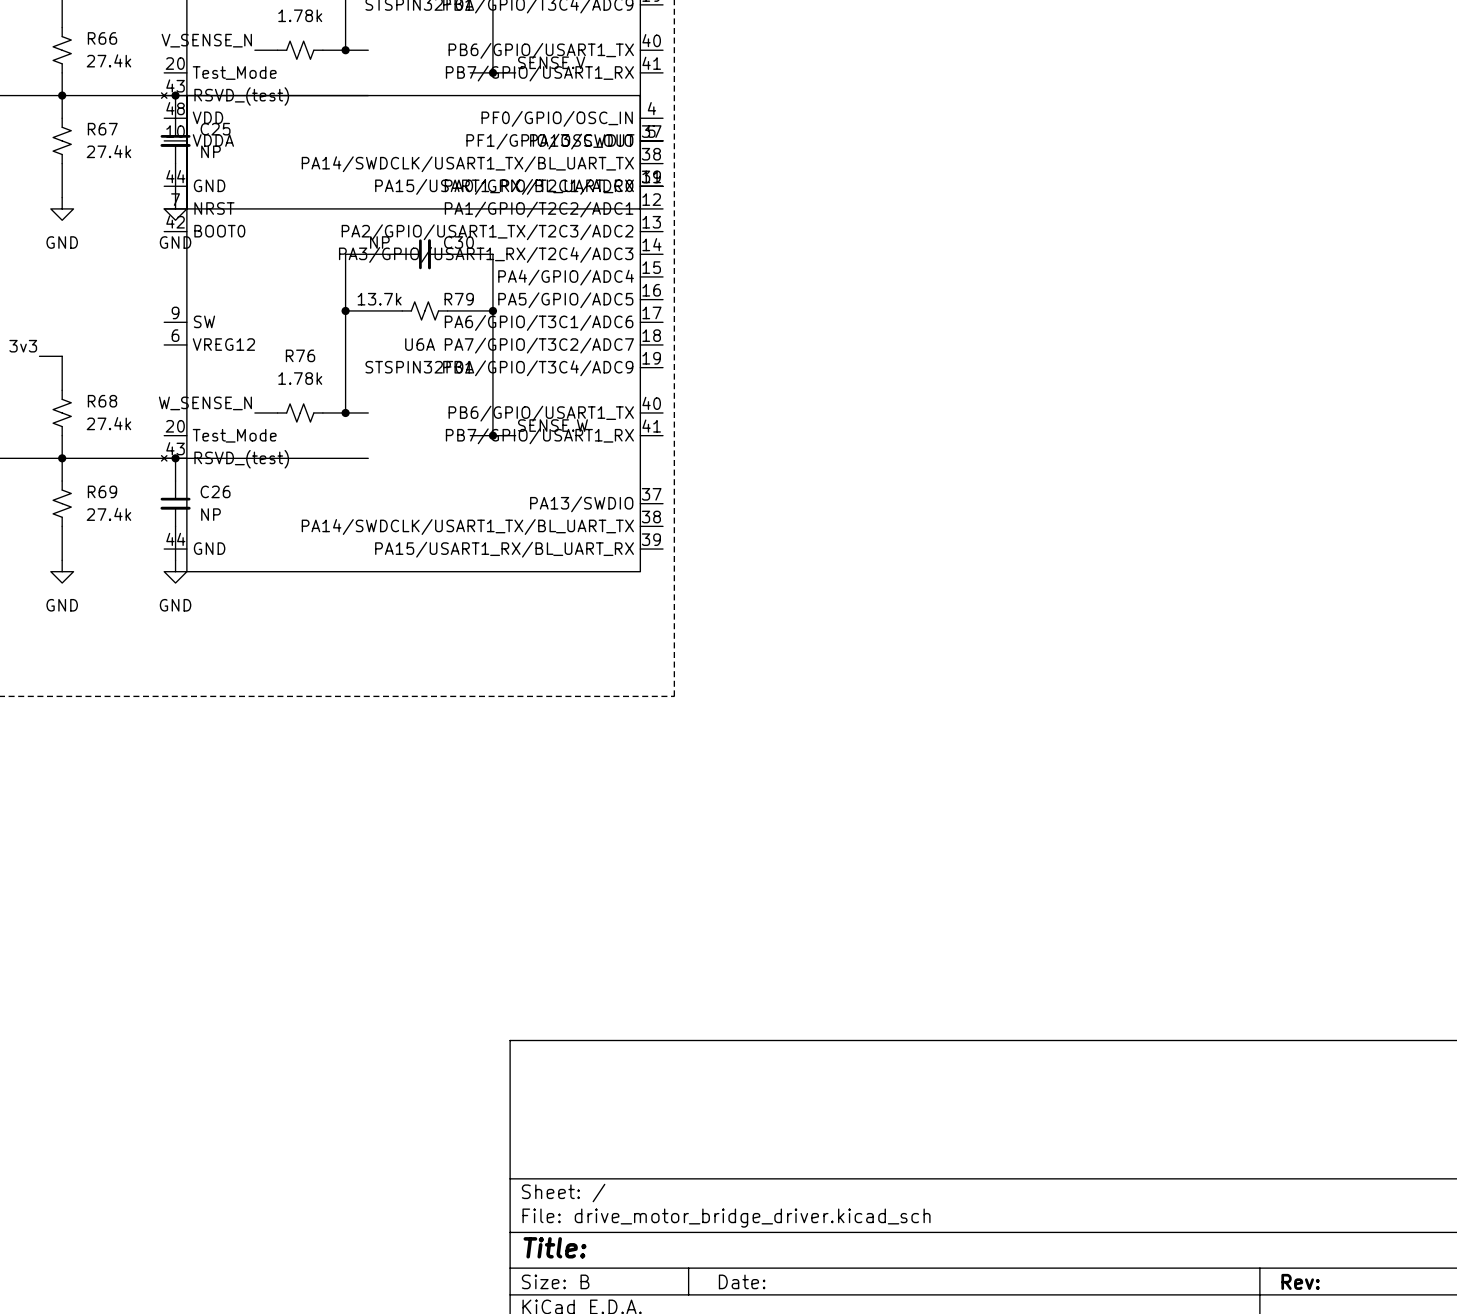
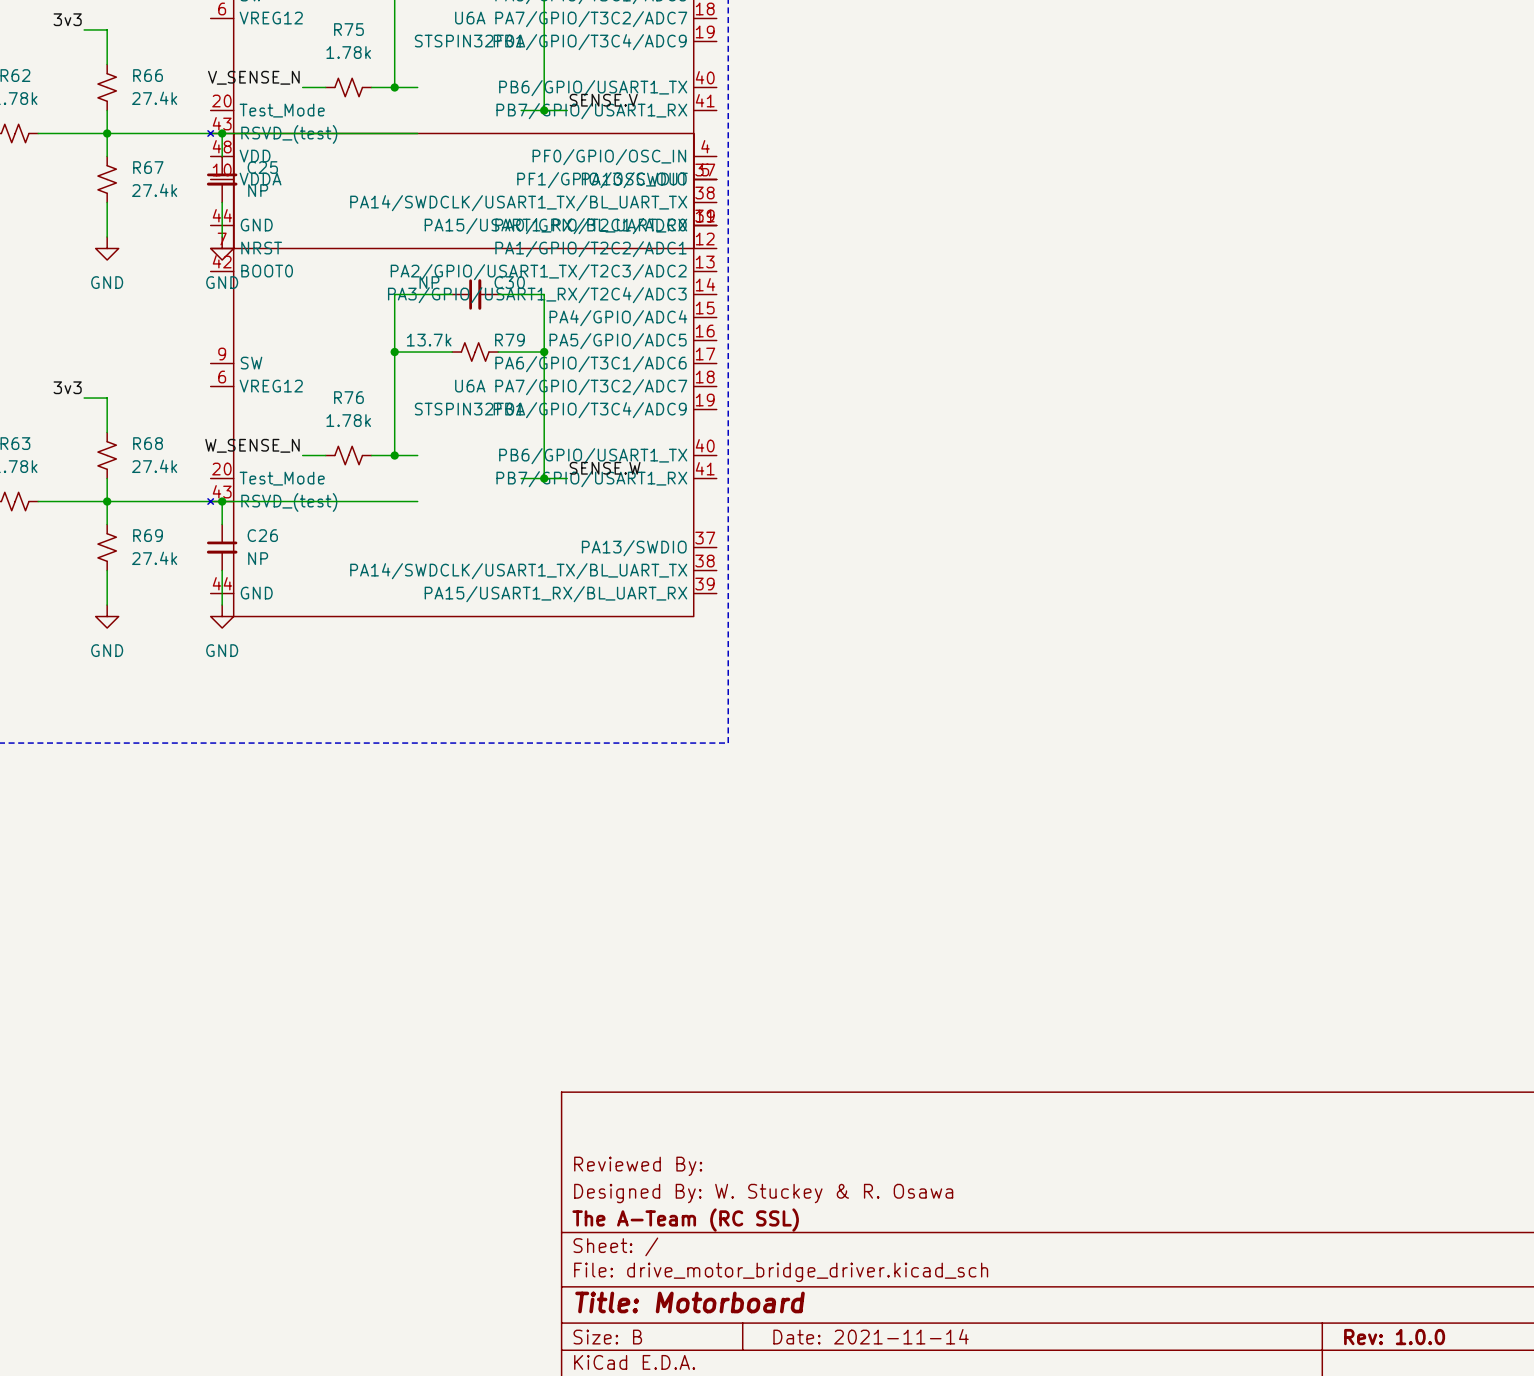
title block: none -> Reviewed By: (638, 1166)
title block: none -> Designed By: W. Stuckey & R. Osawa (763, 1193)
title block: none -> The A-Team (RC SSL) (685, 1220)
title block: Title: (555, 1247) -> Title: Motorboard (690, 1302)
title block: Date: (742, 1281) -> Date: 2021-11-14 (871, 1336)
title block: Rev: (1300, 1281) -> Rev: 1.0.0 (1394, 1337)

